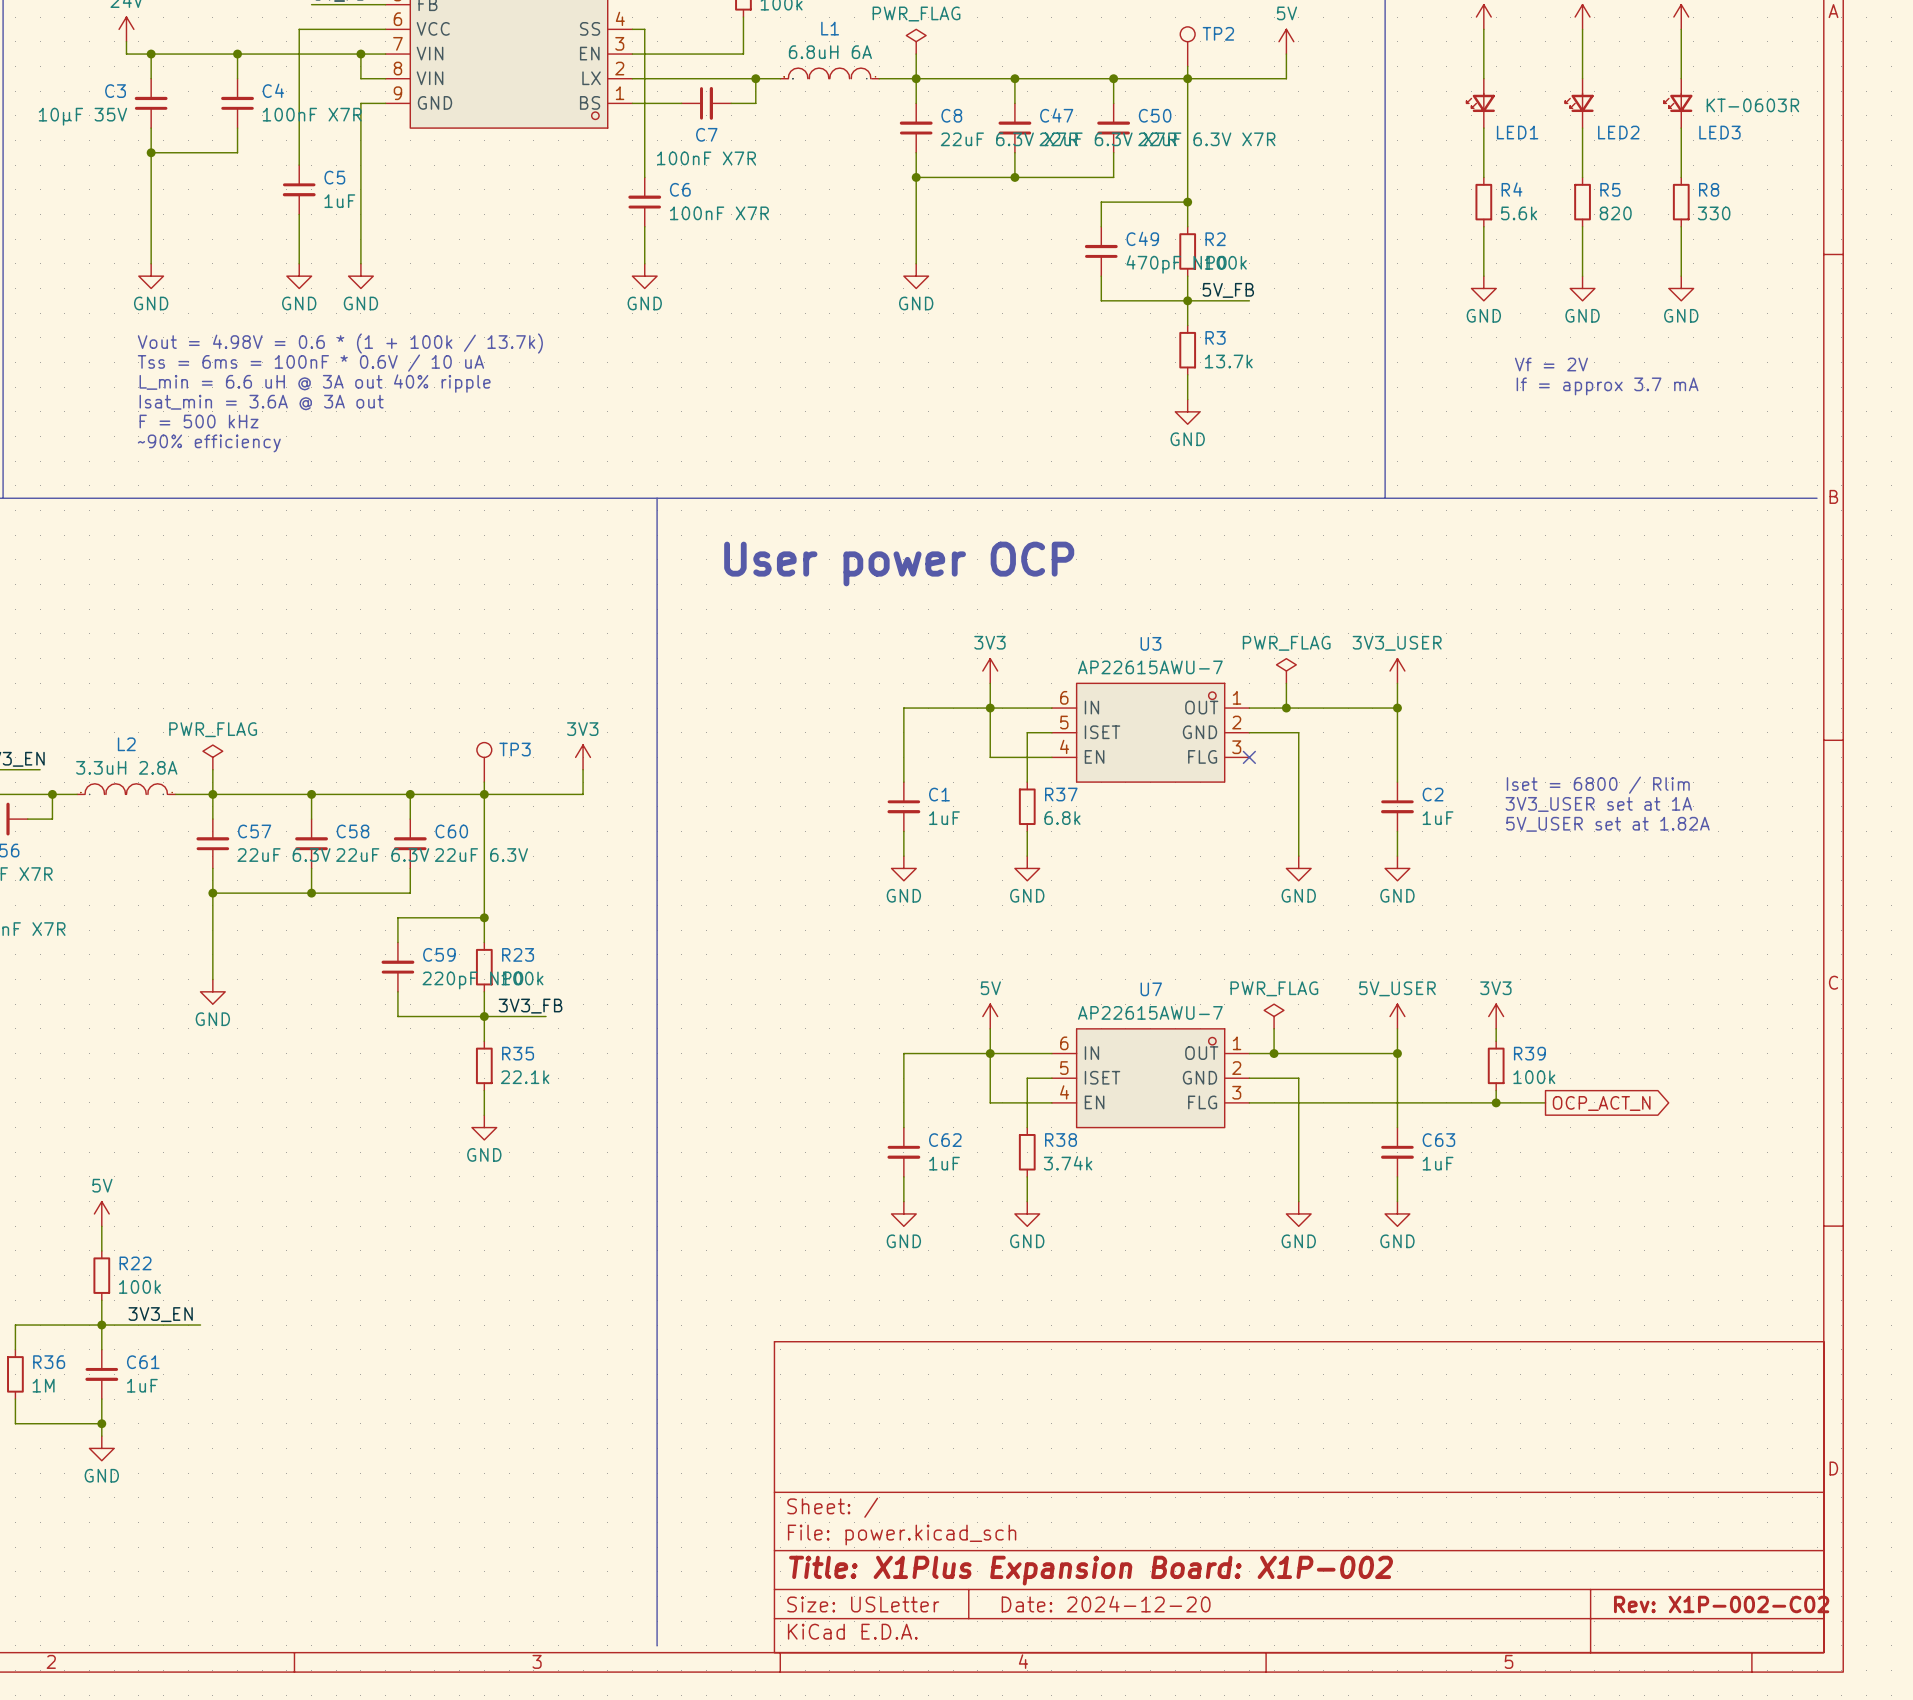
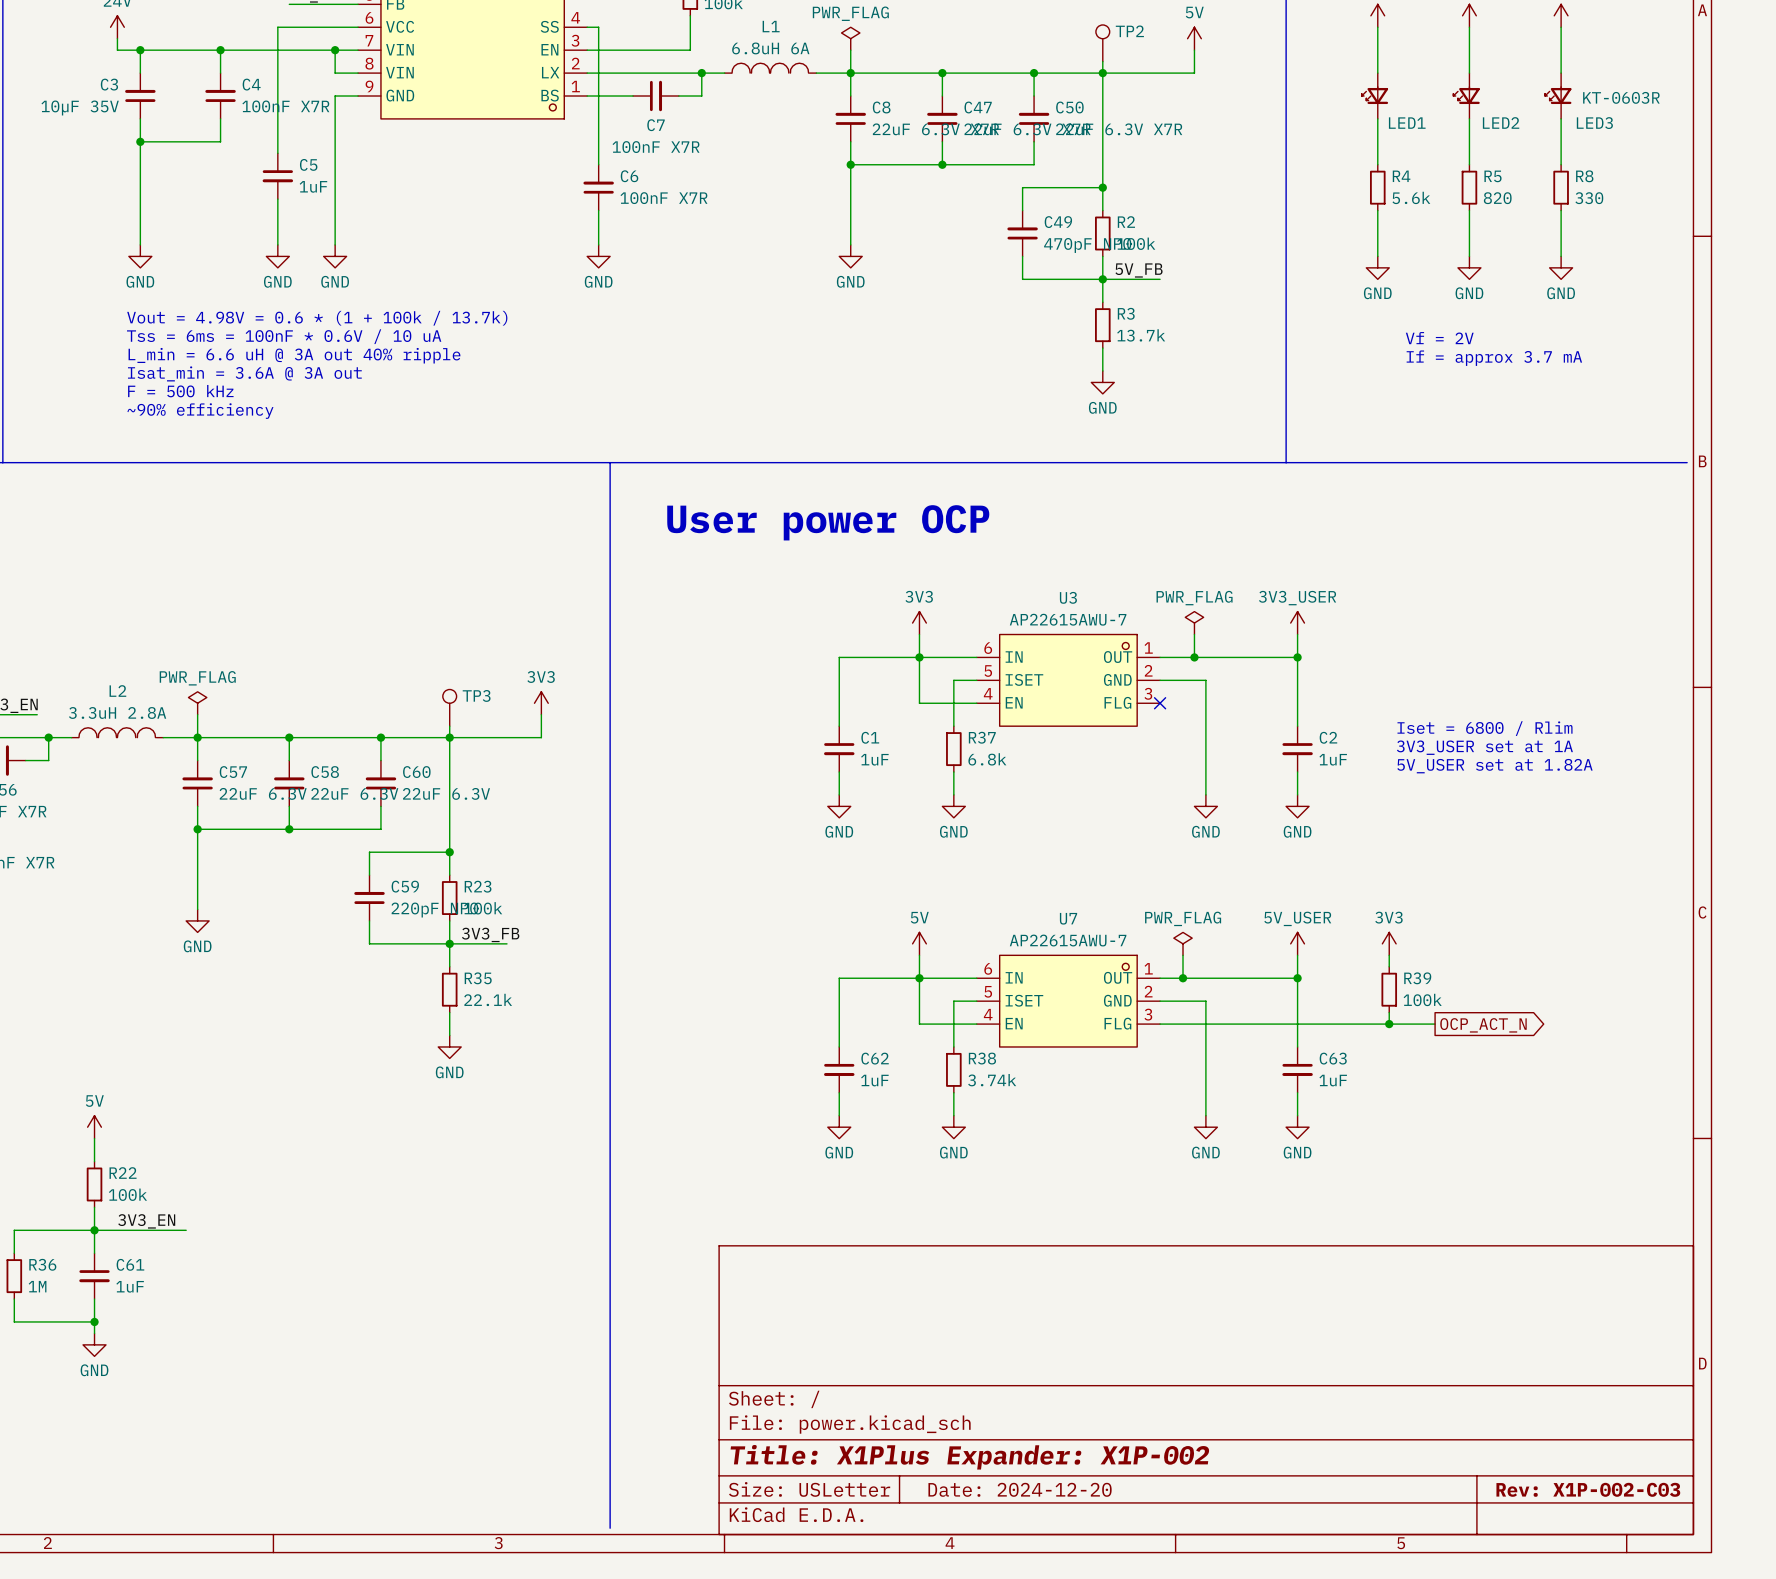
title block: Title: X1Plus Expansion Board: X1P-002 (1091, 1570) -> Title: X1Plus Expander: X1P-002 (969, 1457)
title block: Rev: X1P-002-C02 (1721, 1604) -> Rev: X1P-002-C03 (1588, 1489)

